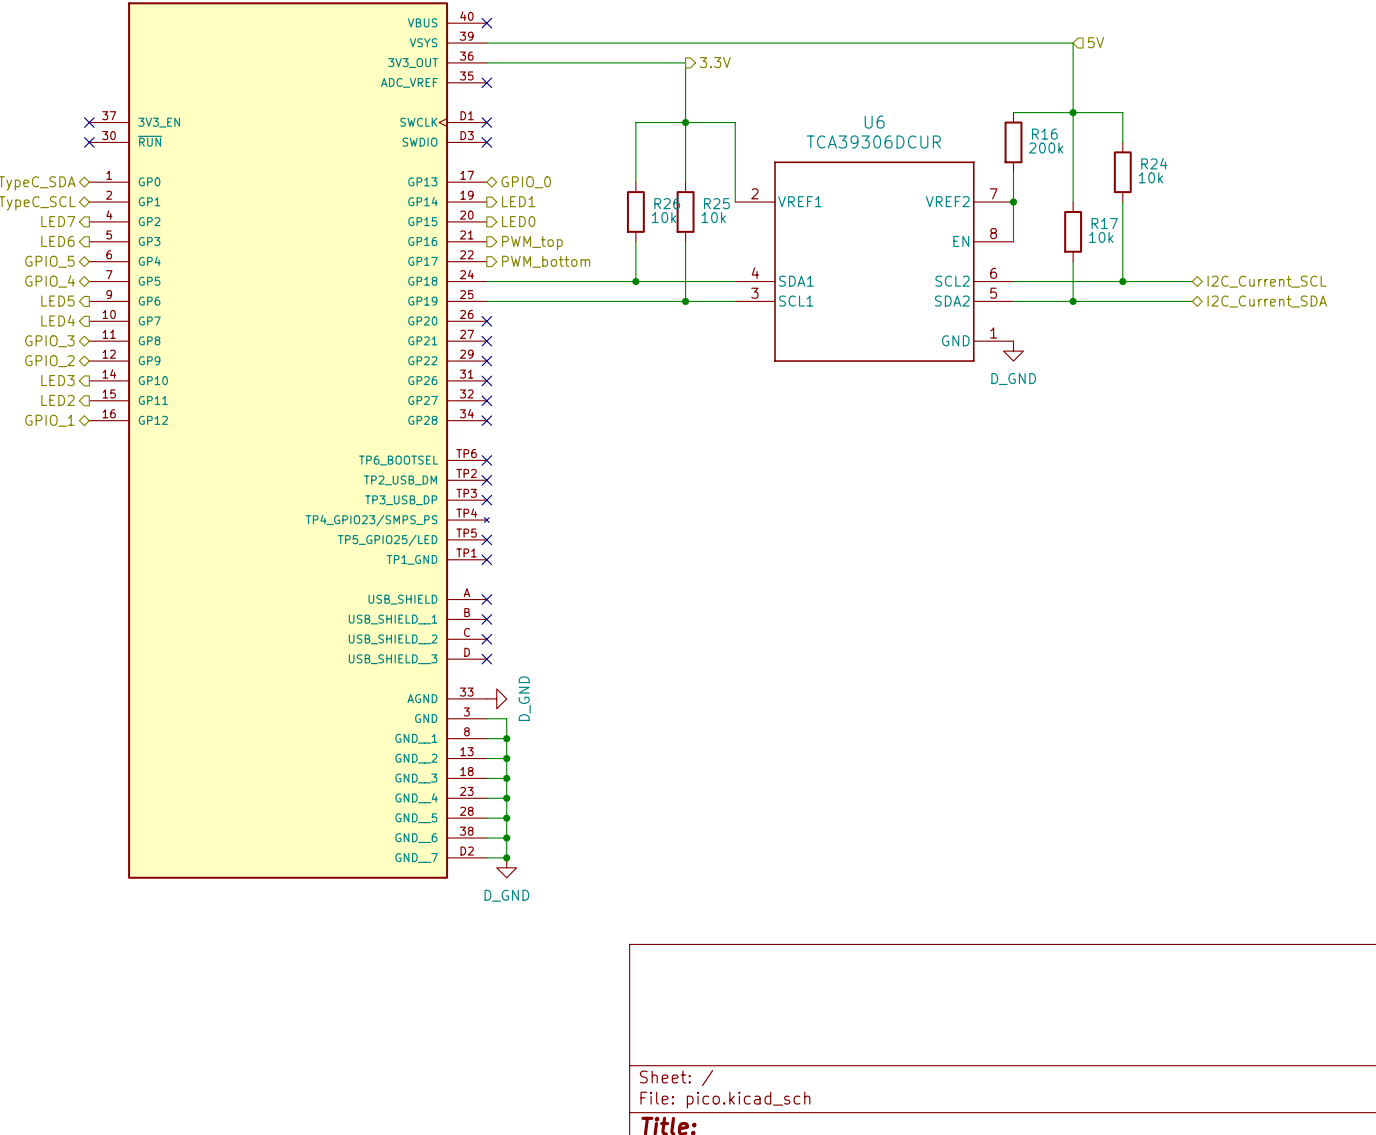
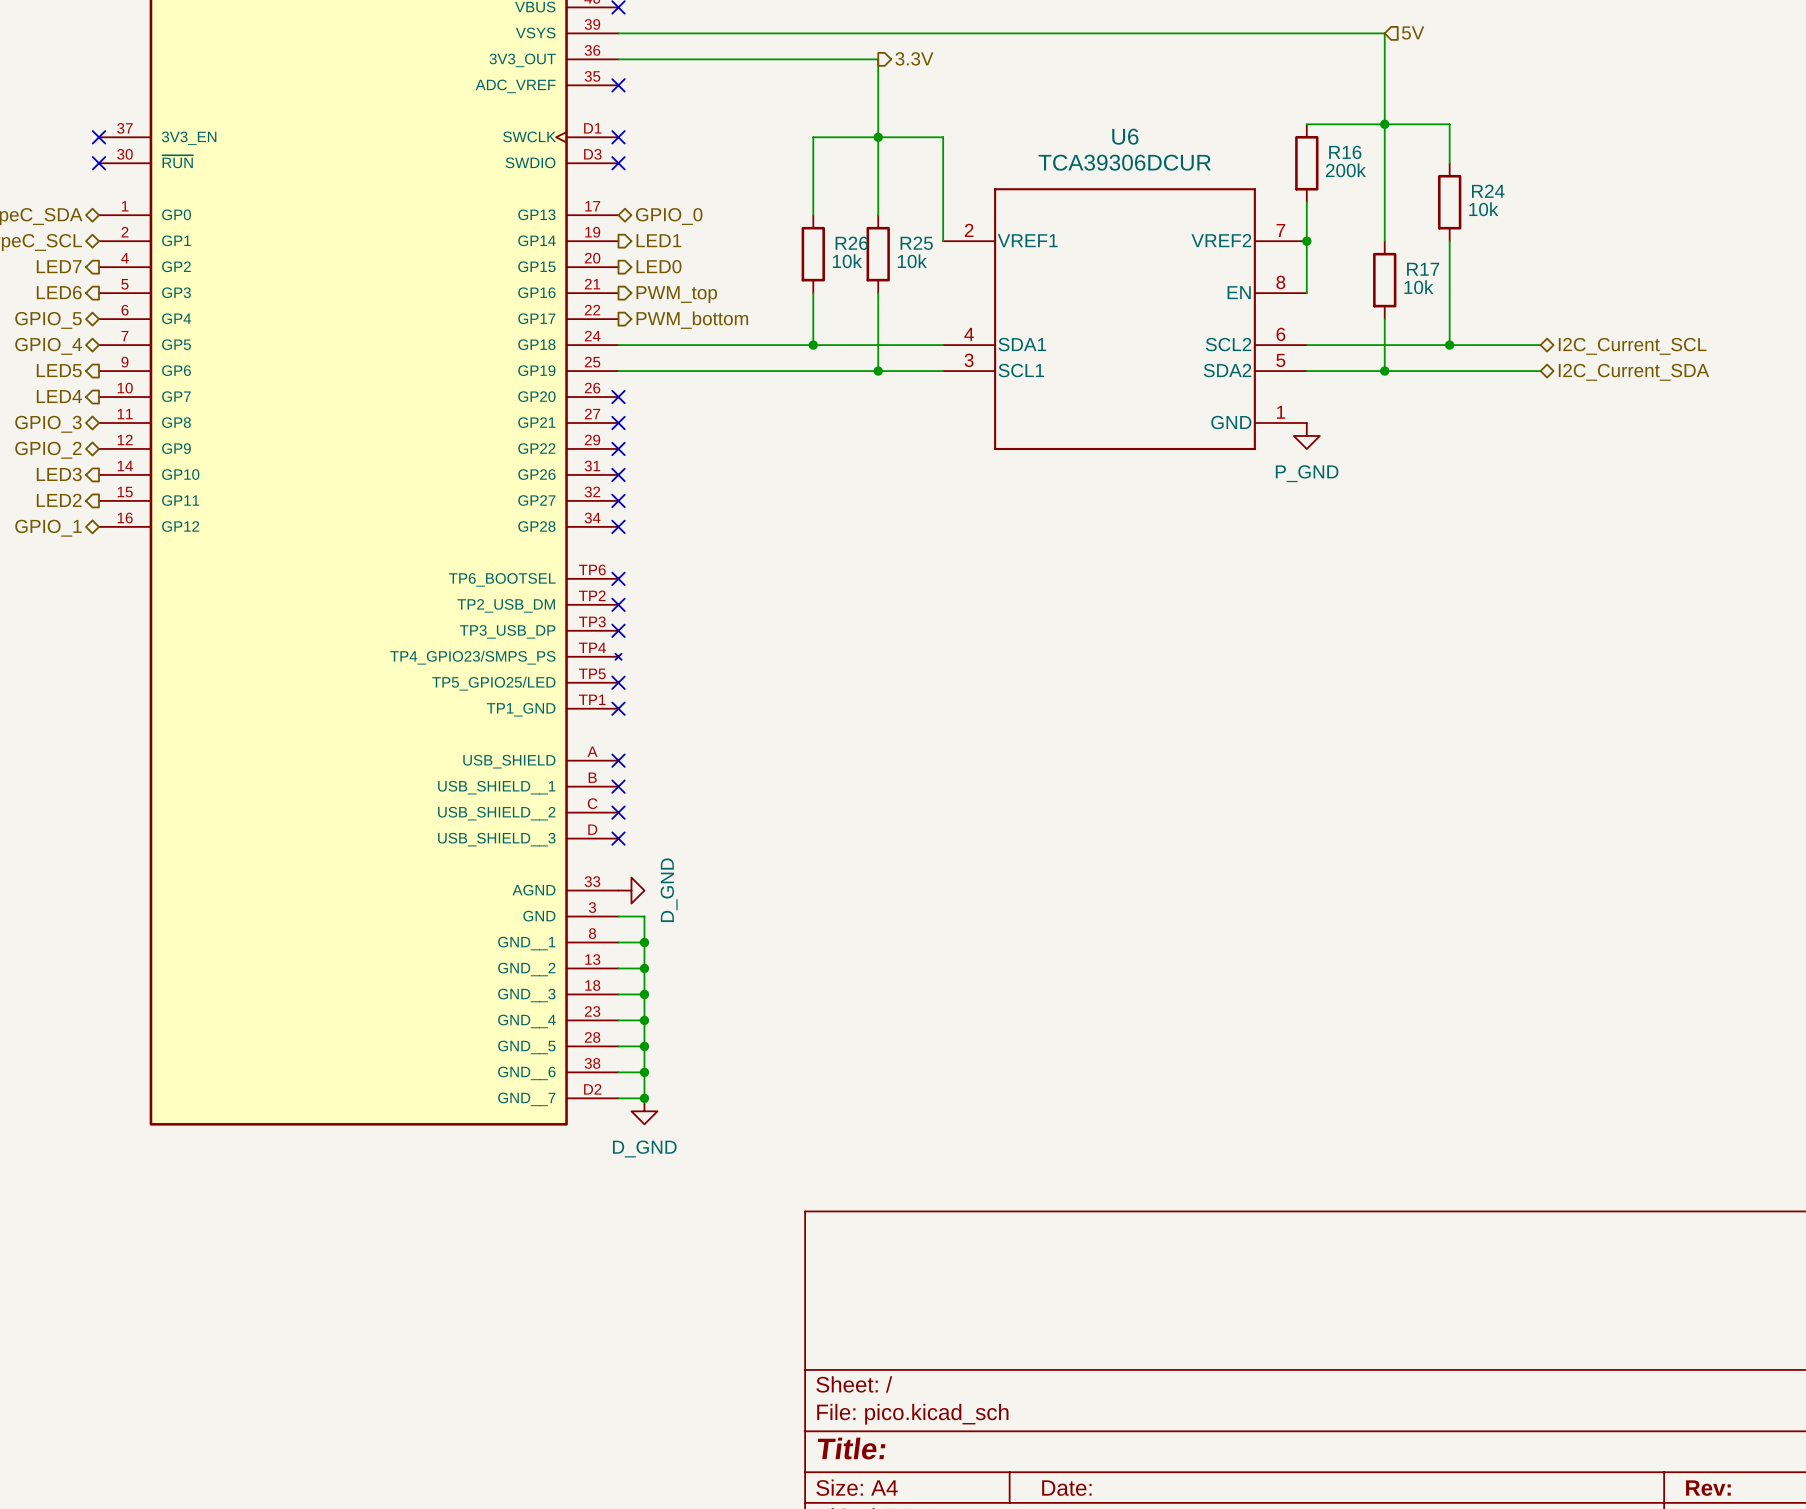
power symbol: D_GND (1013, 351) -> P_GND (1306, 435)

